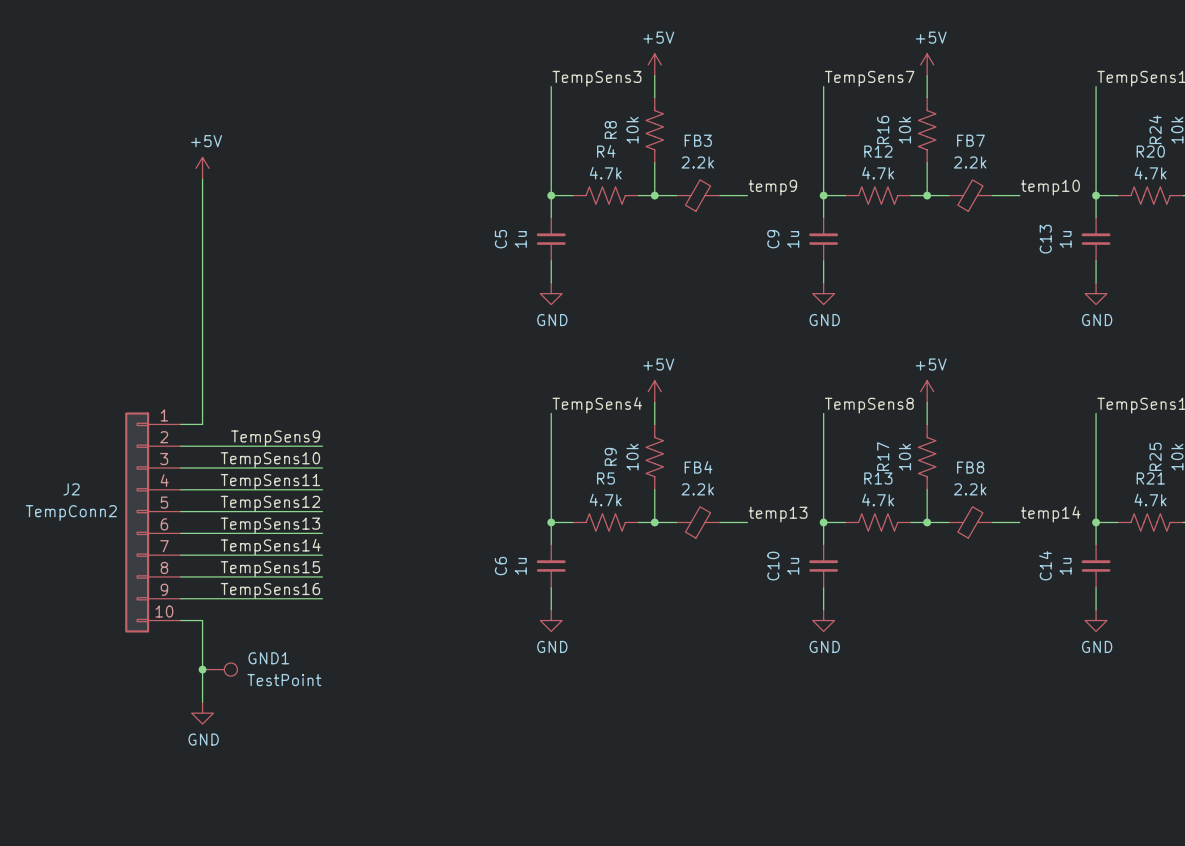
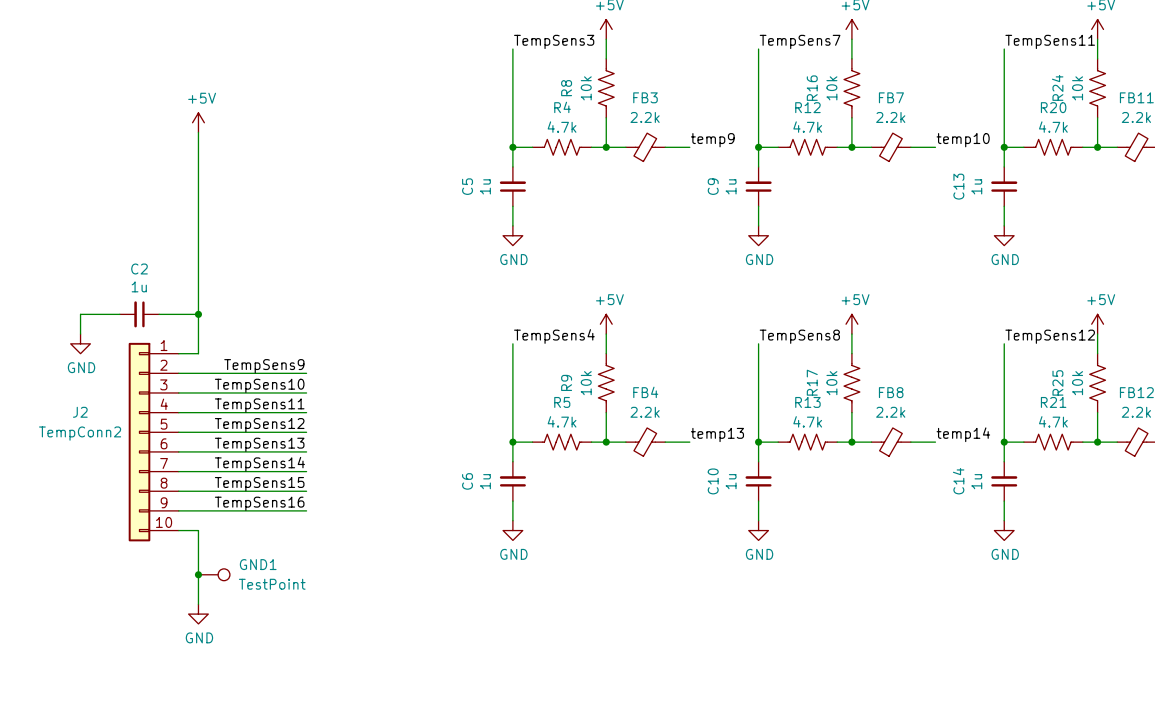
wire: none -> (119, 314) (80, 314) (80, 334)
C2: none -> 1u (139, 314)
wire: none -> (159, 314) (198, 314)
junction: none -> (198, 314)
power symbol: none -> GND (80, 343)

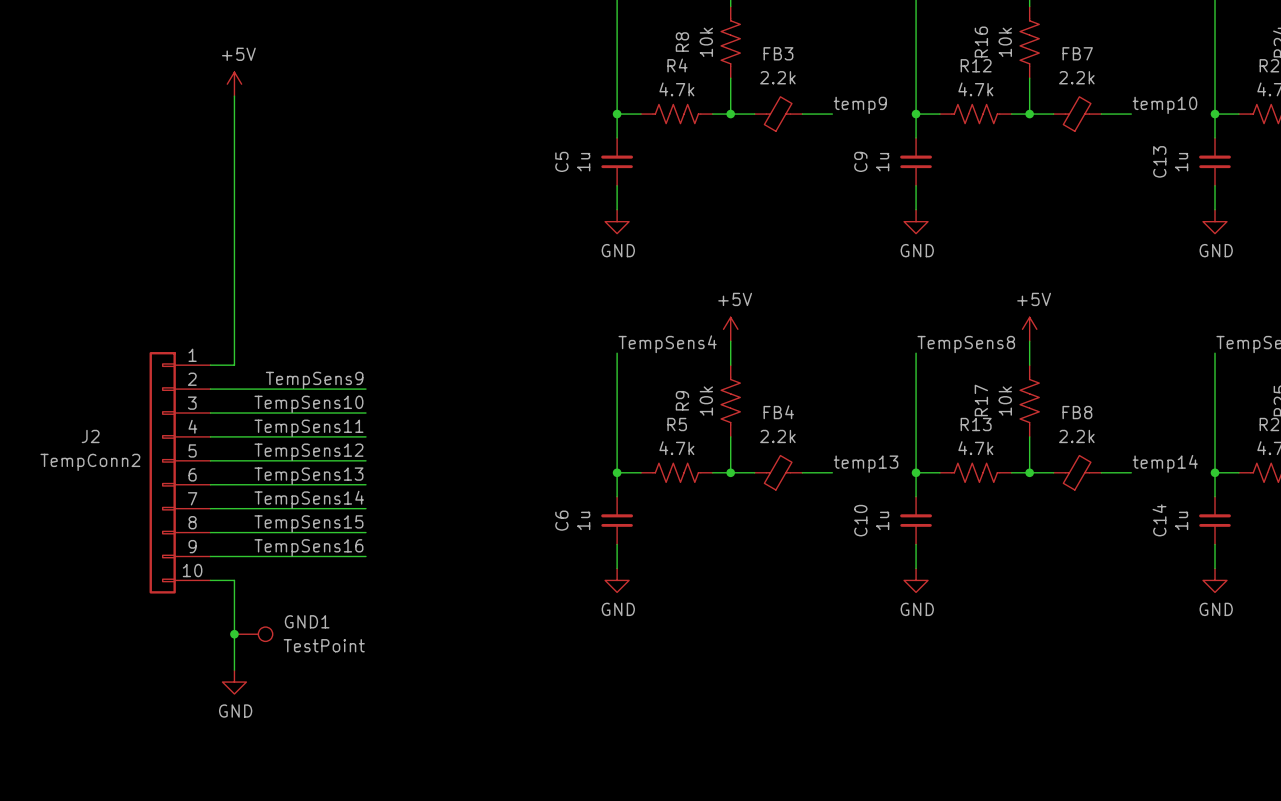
wire: (119, 314) (80, 314) (80, 334) -> none
C2: 1u (139, 314) -> none
wire: (159, 314) (198, 314) -> none
junction: (198, 314) -> none
power symbol: GND (80, 343) -> none

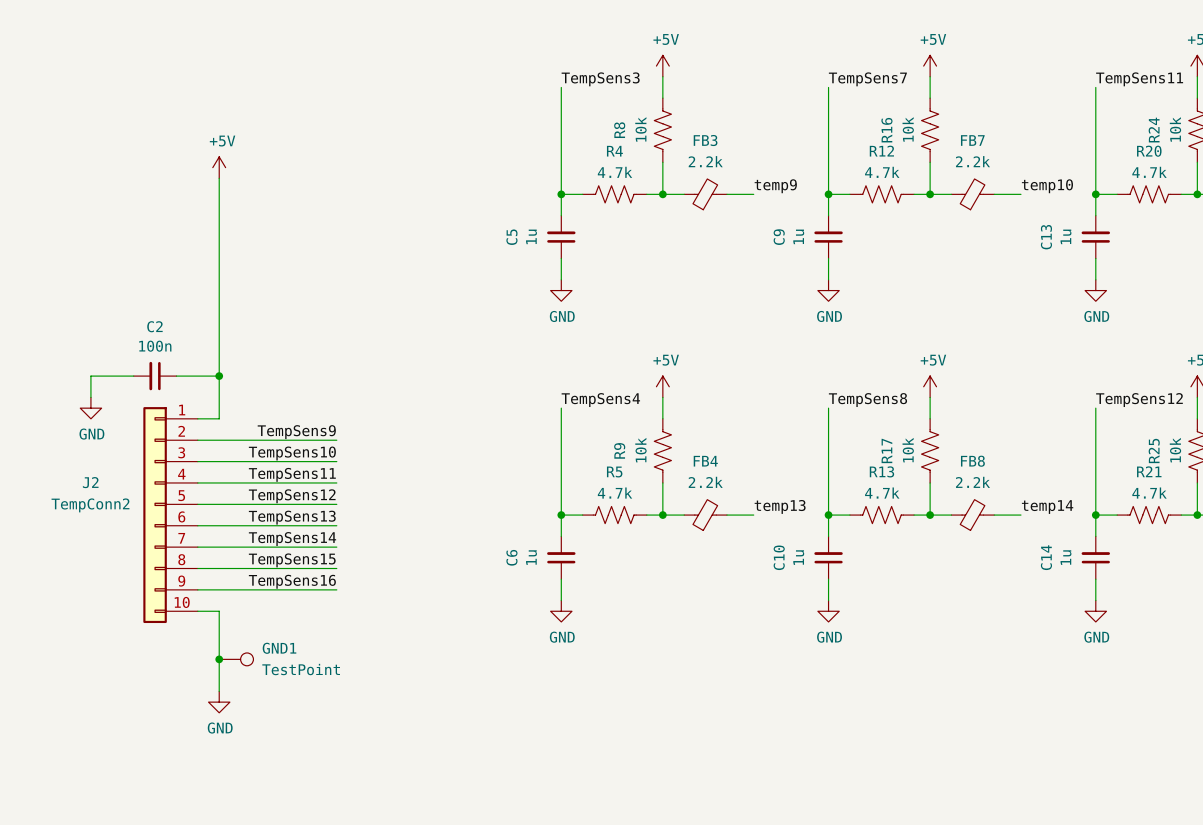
wire: none -> (133, 376) (90, 376) (90, 397)
C2: none -> 100n (155, 376)
wire: none -> (176, 376) (219, 376)
junction: none -> (219, 376)
power symbol: none -> GND (90, 408)

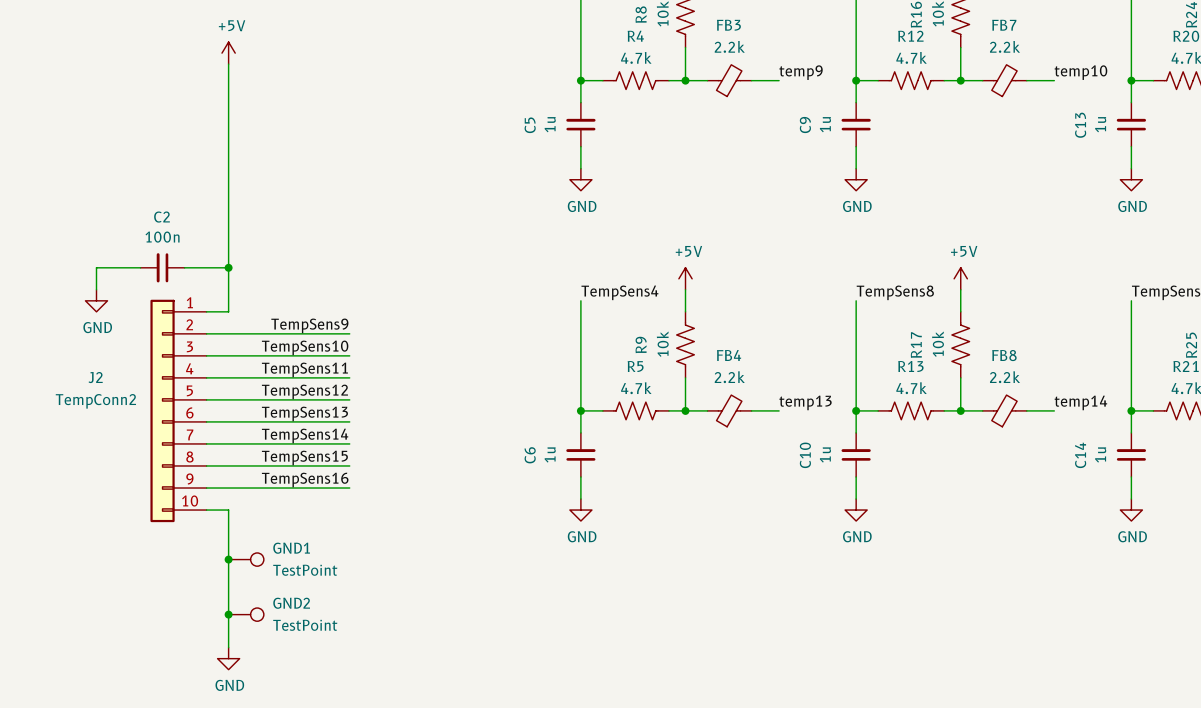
wire: none -> (228, 592) (228, 647)
power symbol position: GND (219, 702) -> GND (228, 658)
junction: none -> (228, 614)
GND2: none -> TestPoint (246, 614)

